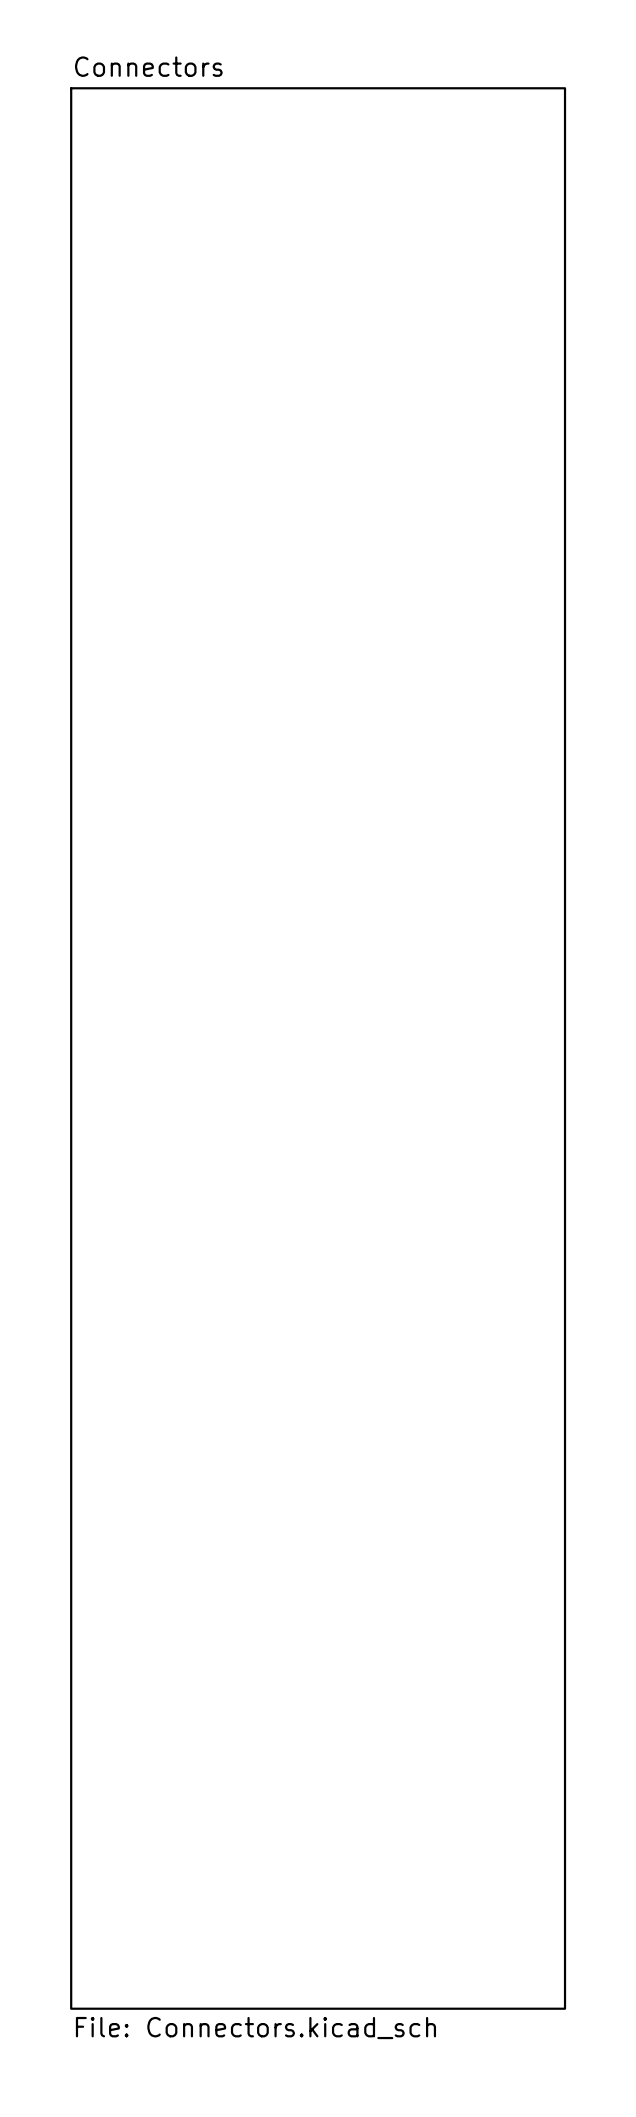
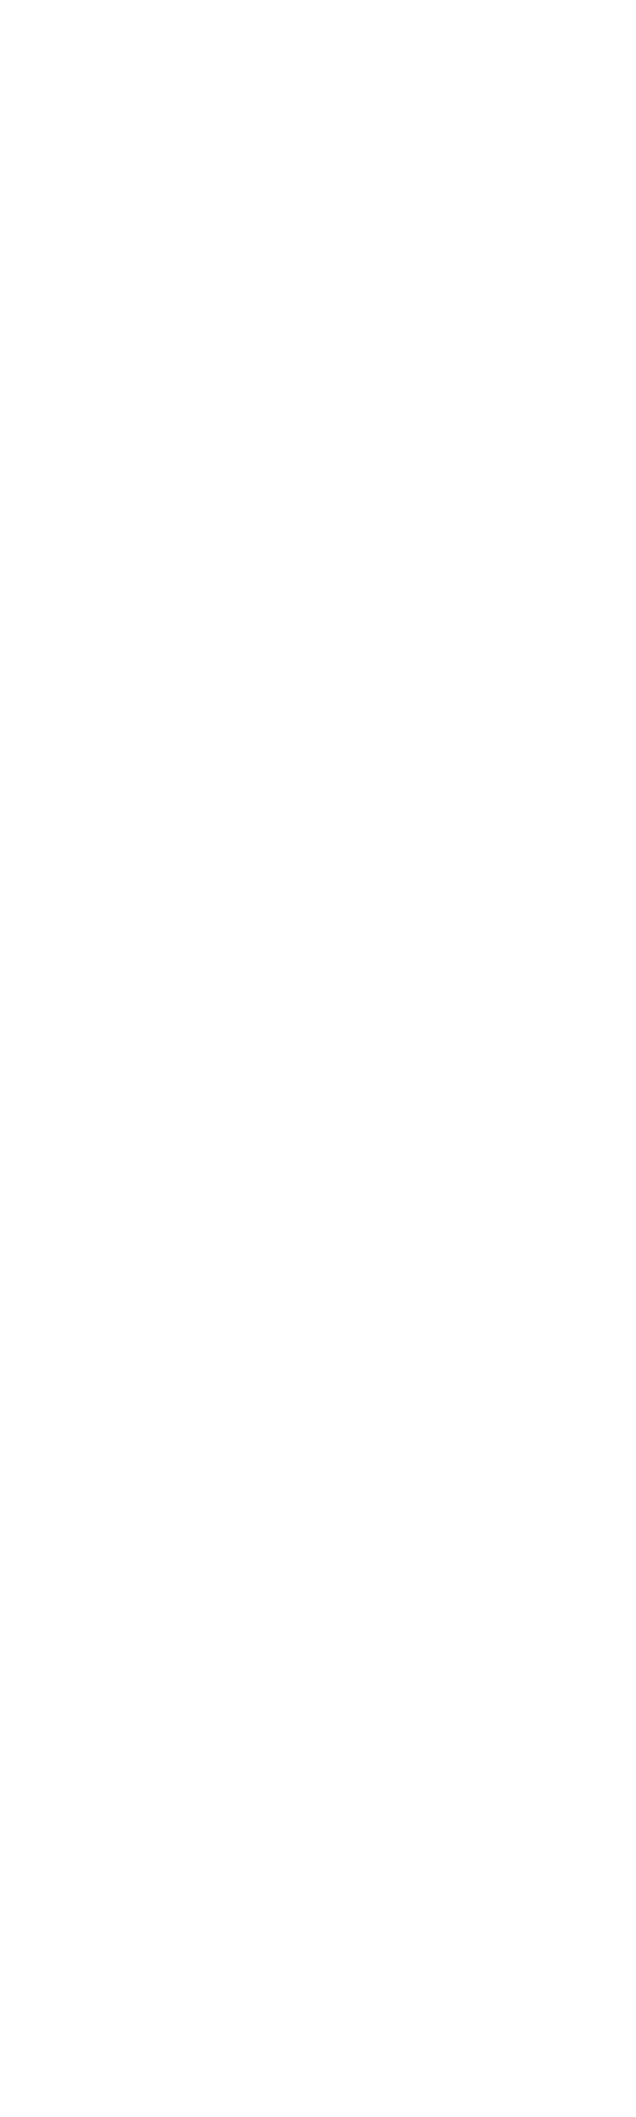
sheet Connectors: File: Connectors.kicad_sch (318, 1048) -> none

